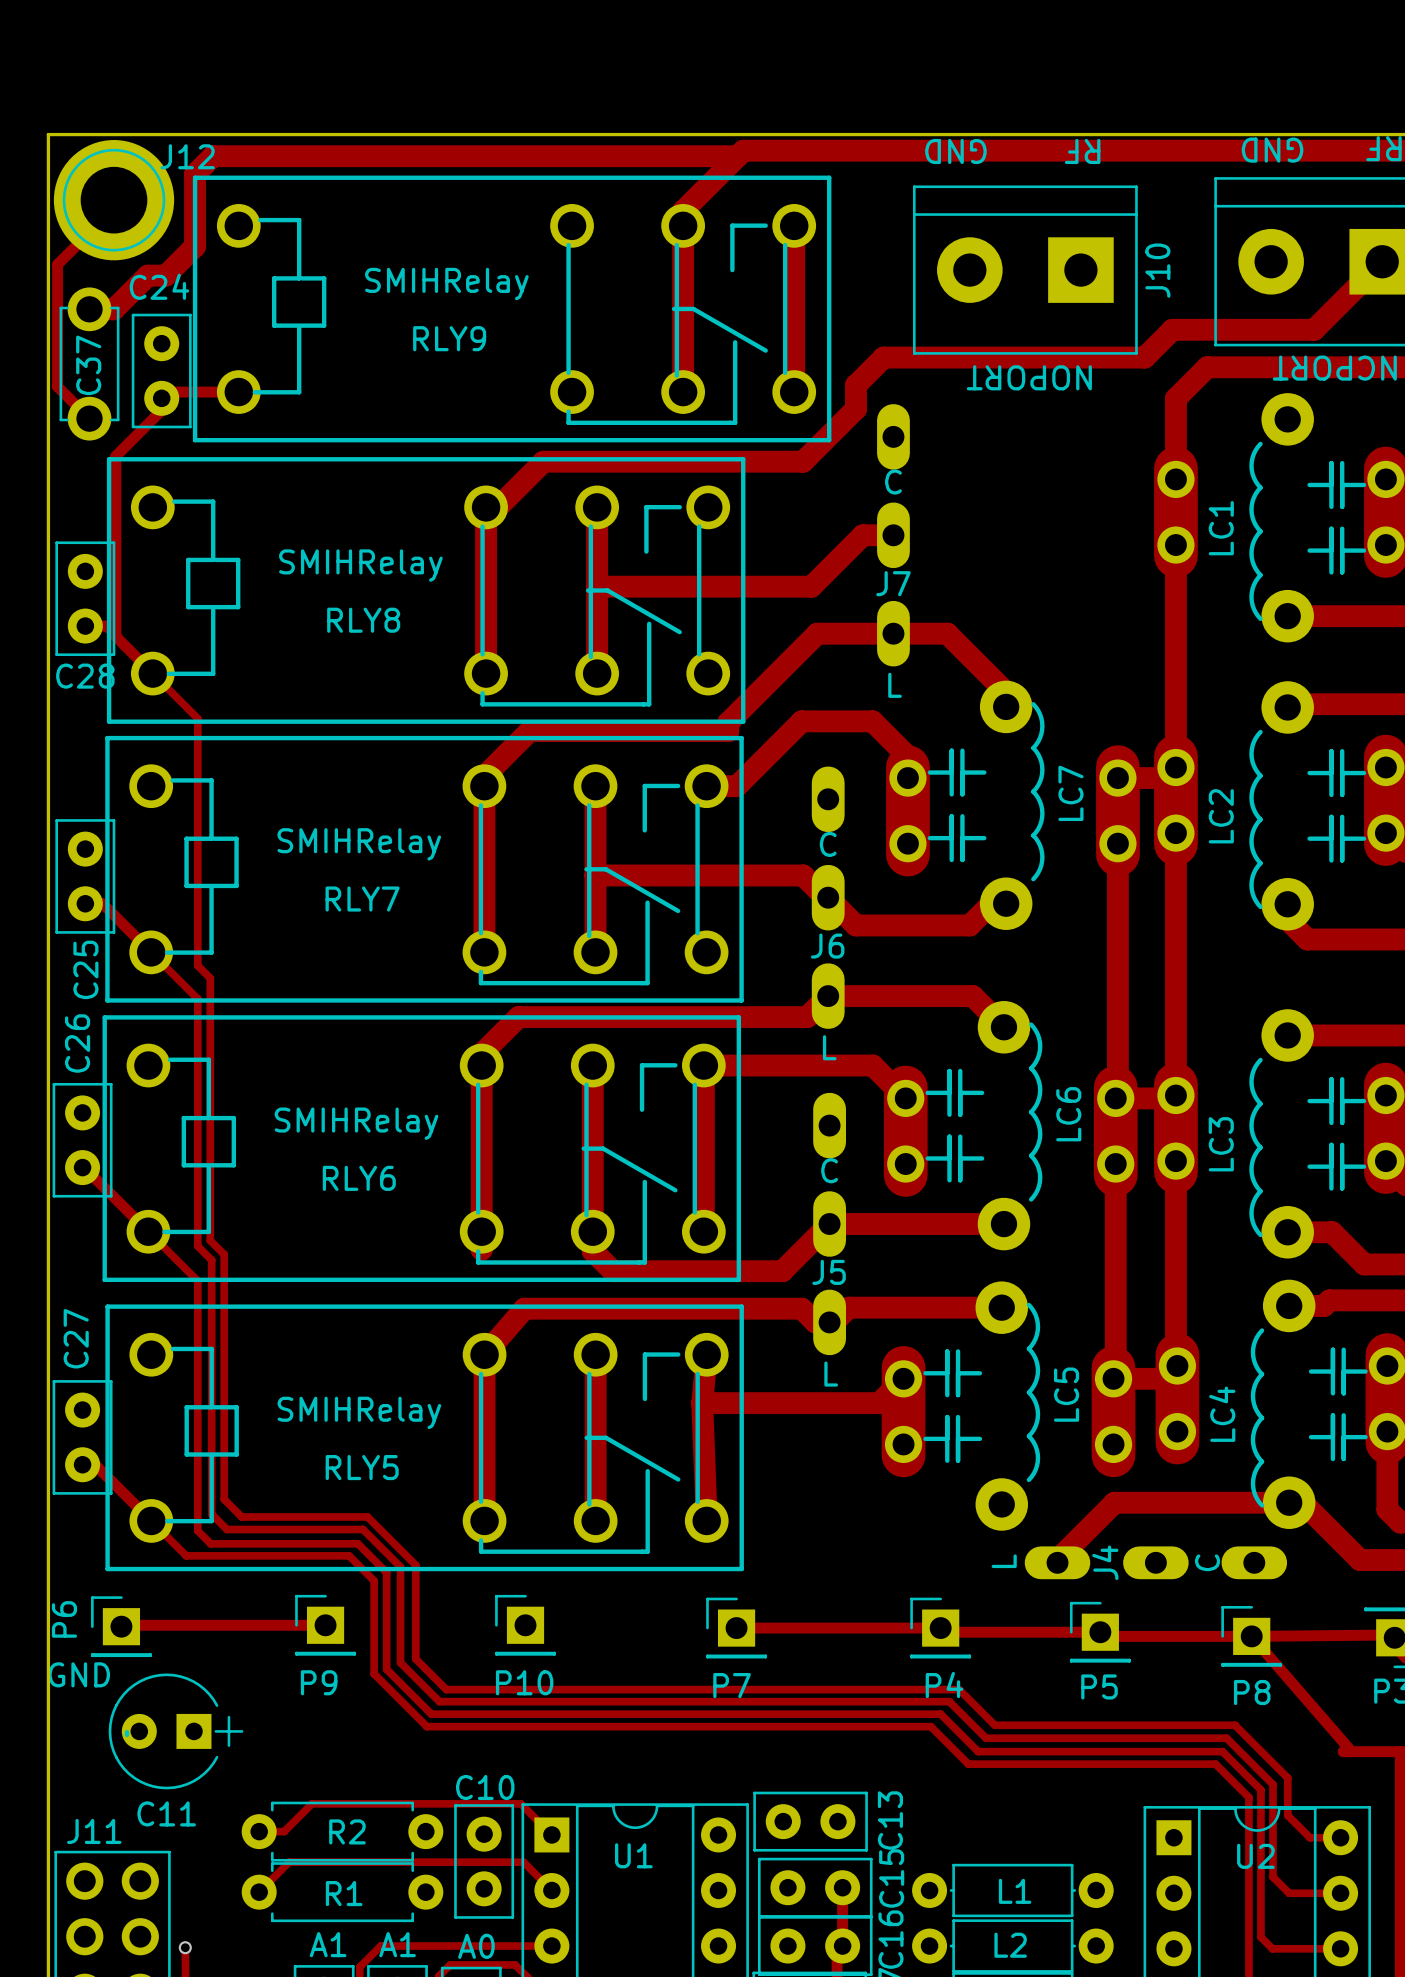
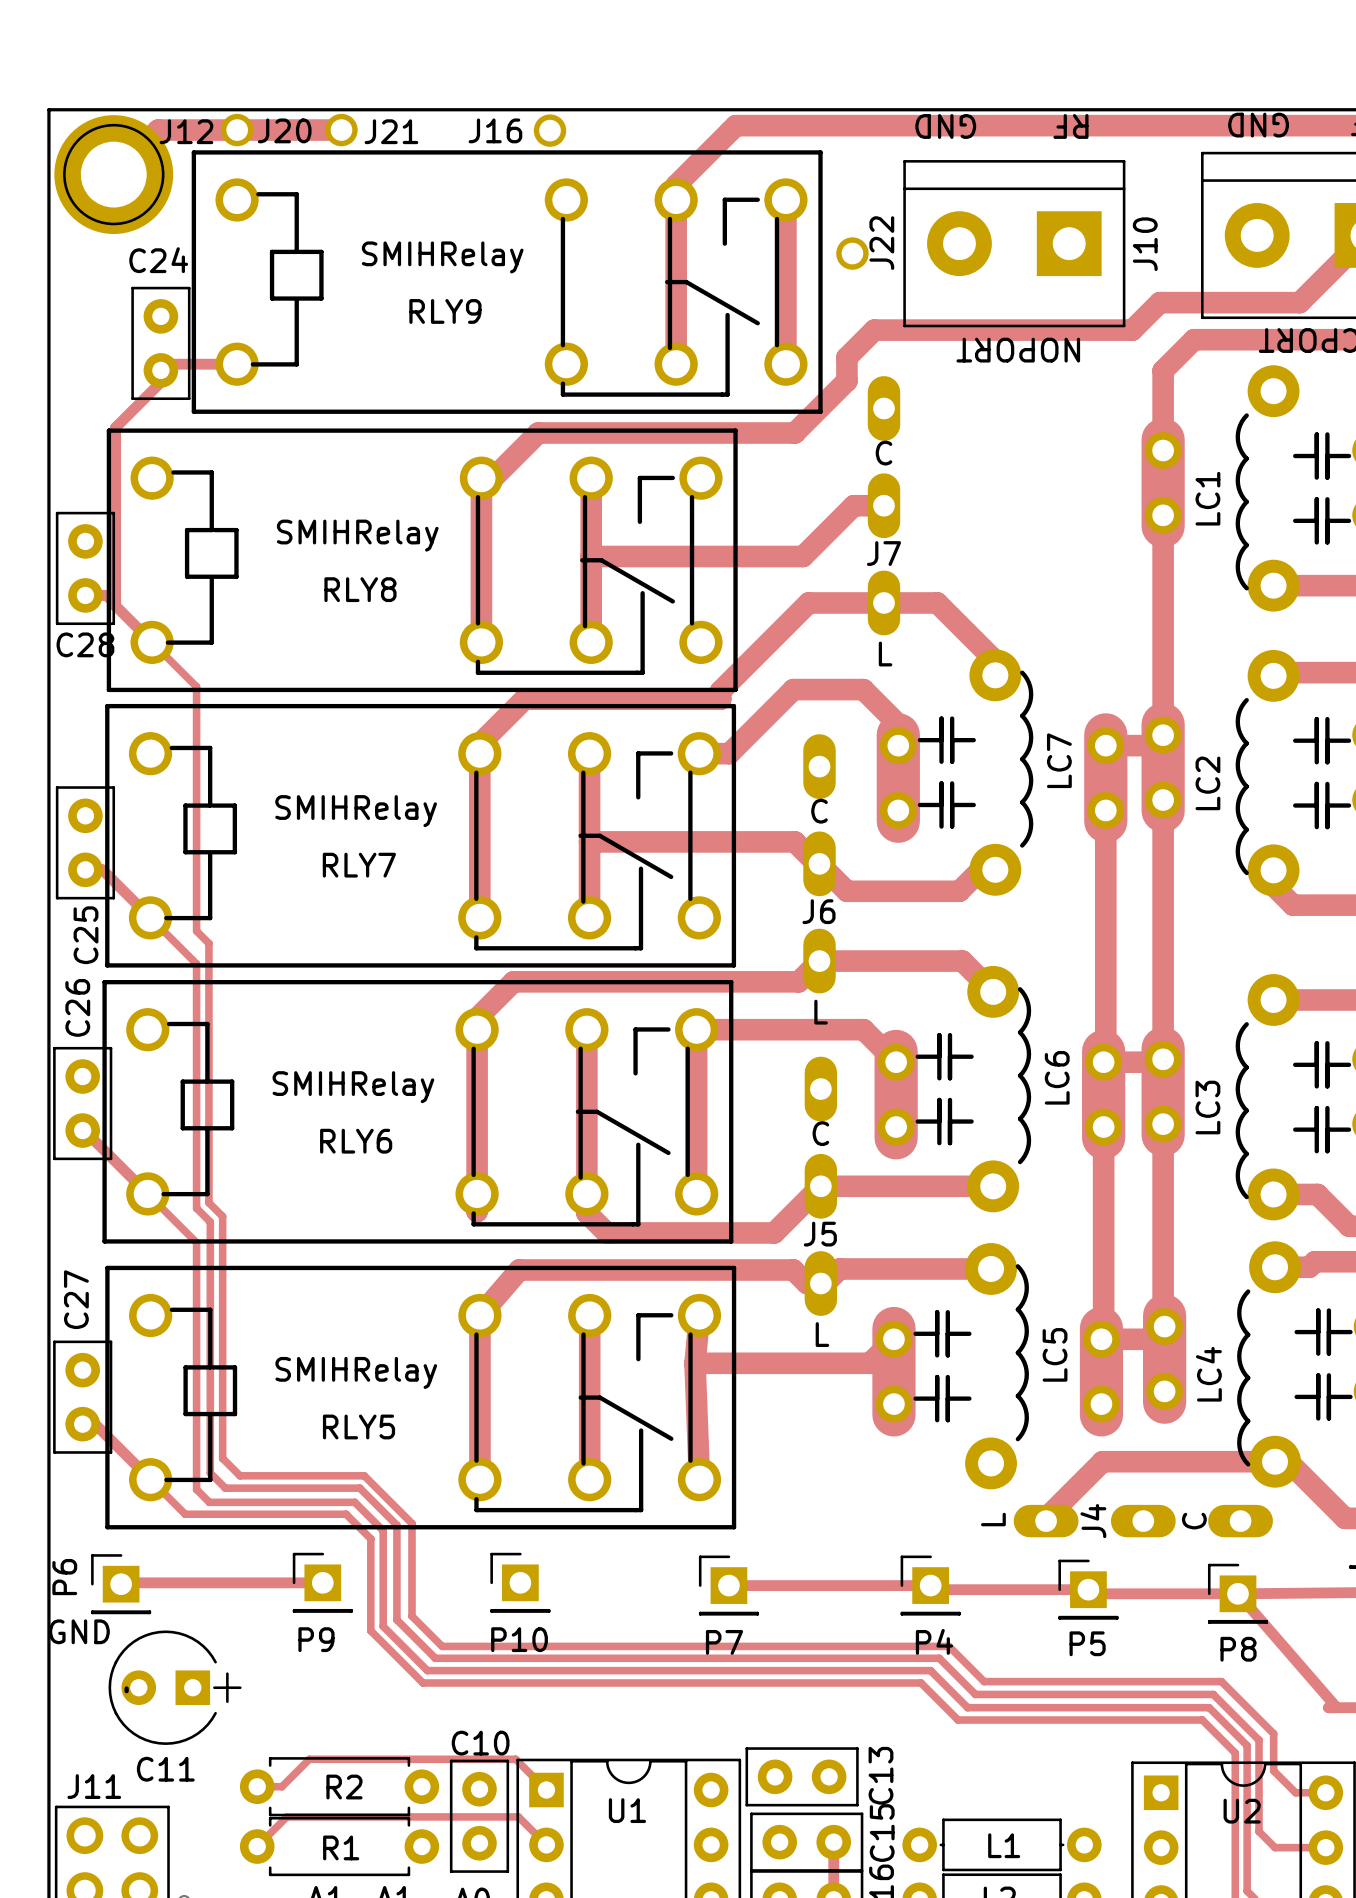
J20: none -> (237, 130)
track: none -> (341, 130) (158, 130) (113, 174)
J21: none -> (341, 130)
J16: none -> (550, 130)
track: (737, 156) (213, 156) (195, 174) (195, 246) (165, 275) (147, 275) (114, 309) (89, 309) -> none
track: (114, 208) (57, 264) (57, 386) (89, 418) -> none
J22: none -> (852, 253)
C37: (89, 363) -> none

